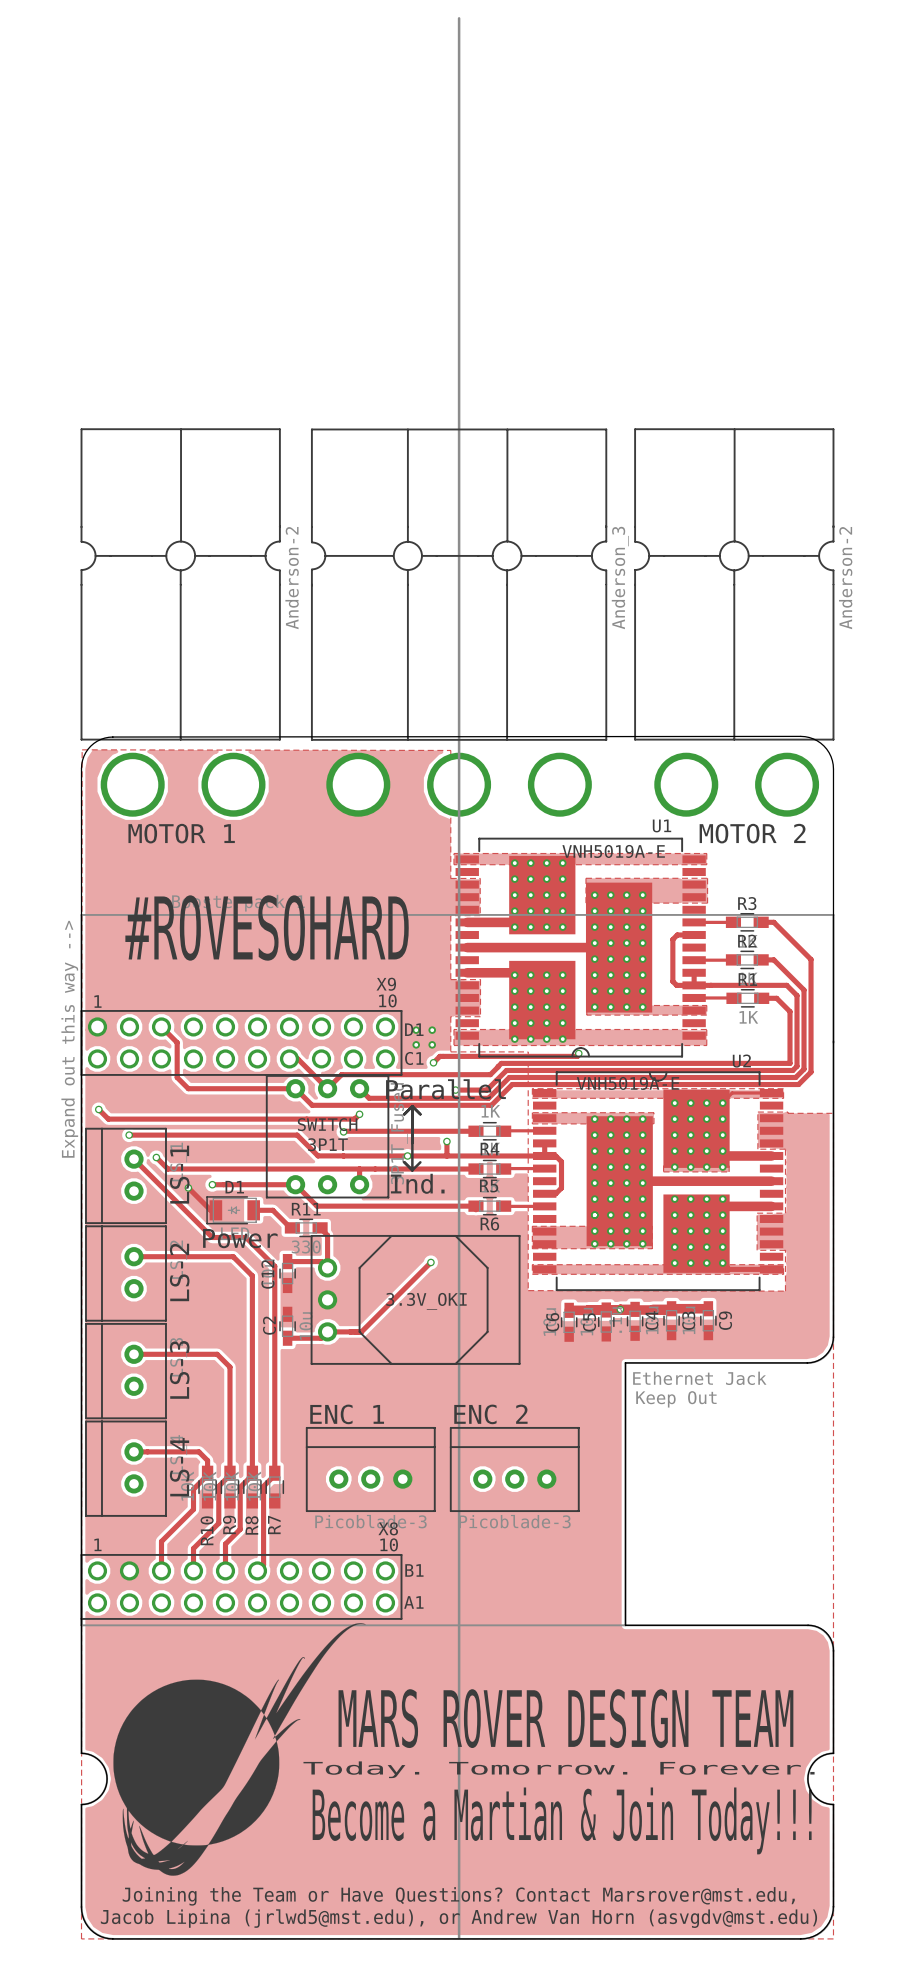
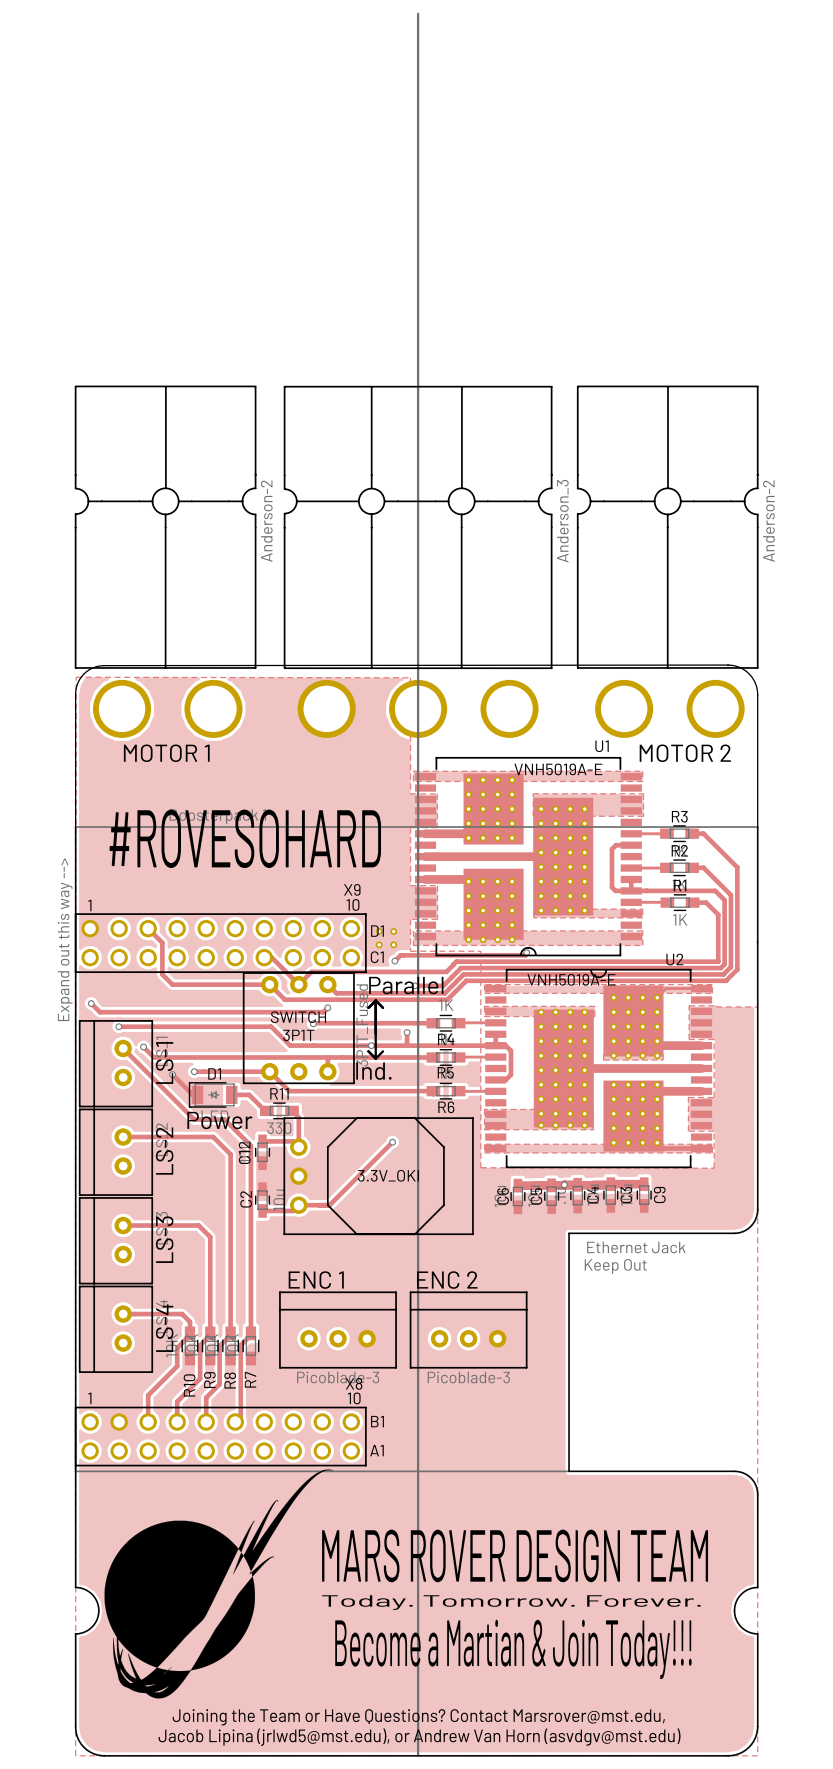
text: Jacob Lipina (jrlwd5@mst.edu), or Andrew Van Horn (asvgdv@mst.edu) (458, 1918) -> Jacob Lipina (jrlwd5@mst.edu), or Andrew Van Horn (asvdgv@mst.edu) (419, 1737)

